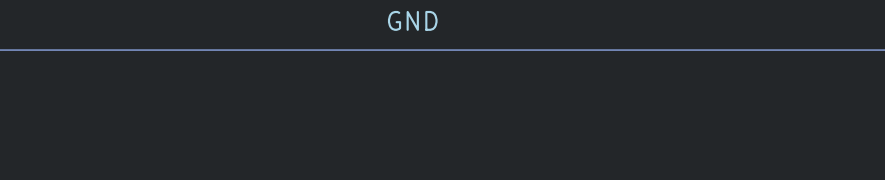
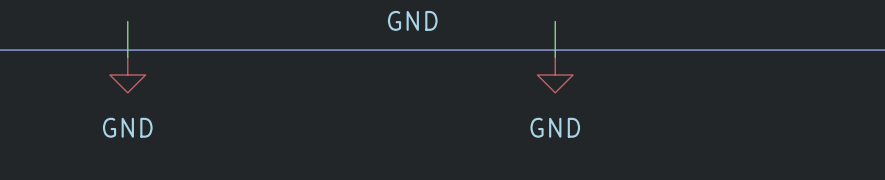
wire: none -> (127, 21) (127, 57)
wire: none -> (555, 21) (555, 57)
power symbol: none -> GND (127, 74)
power symbol: none -> GND (555, 74)

